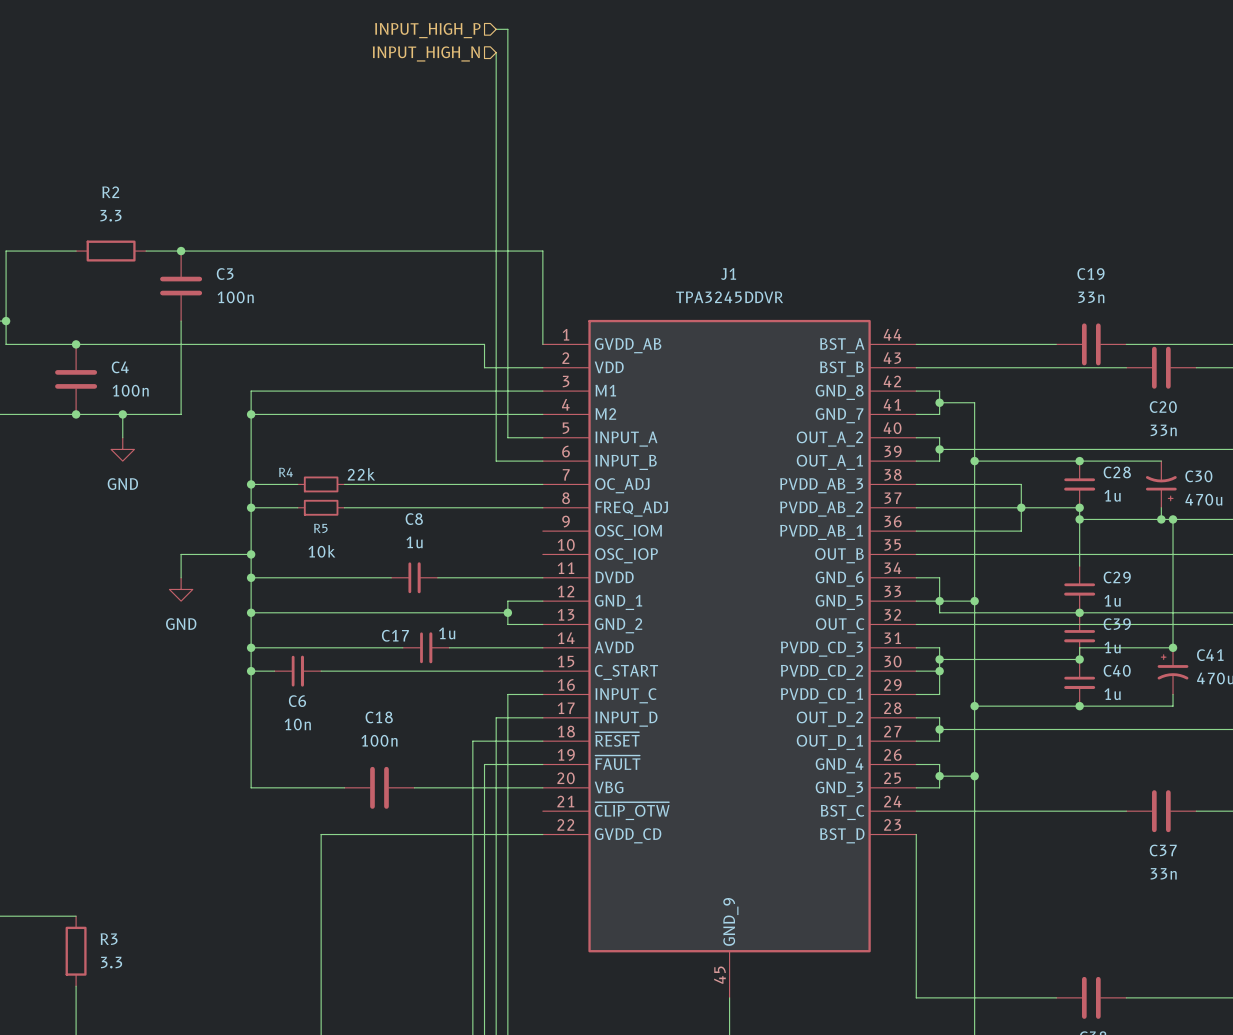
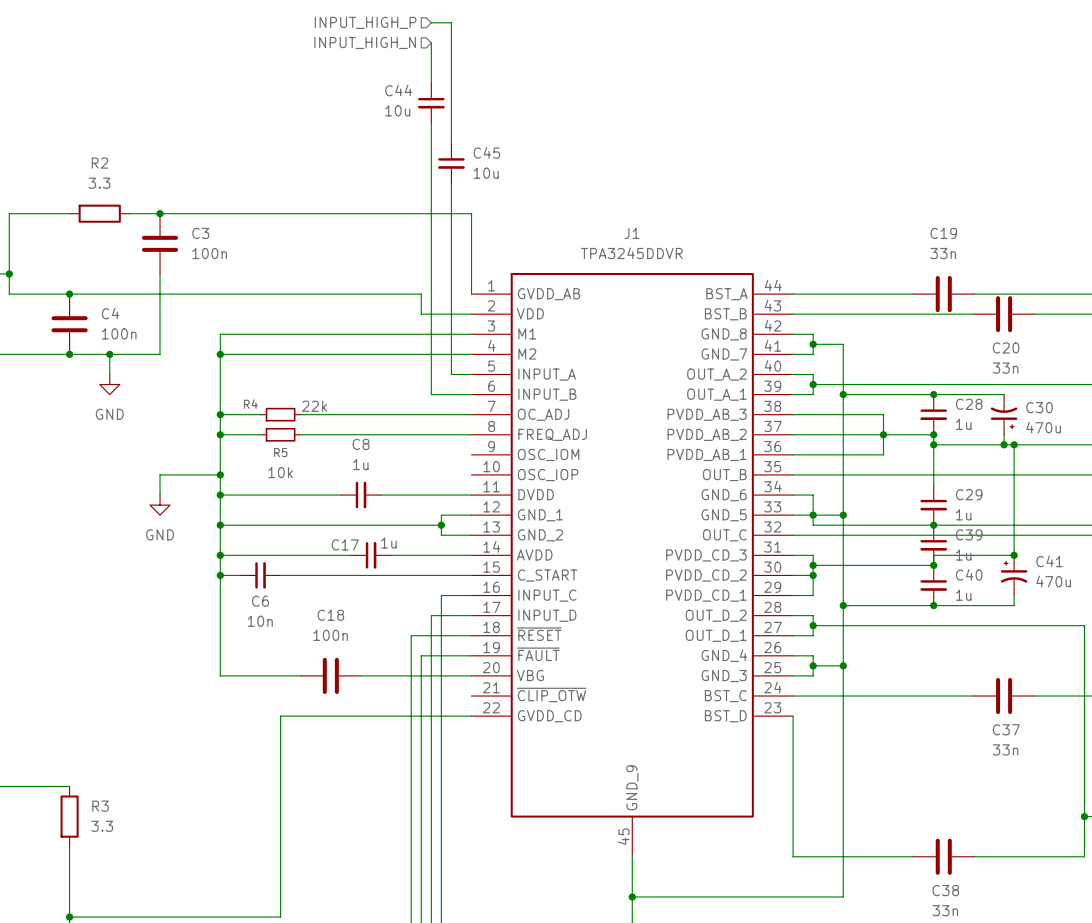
wire: (507, 29) (507, 437) (519, 437) -> (451, 183) (451, 374)
wire: none -> (441, 22) (451, 22) (451, 143)
C44: none -> 10u (431, 103)
C45: none -> 10u (451, 163)

